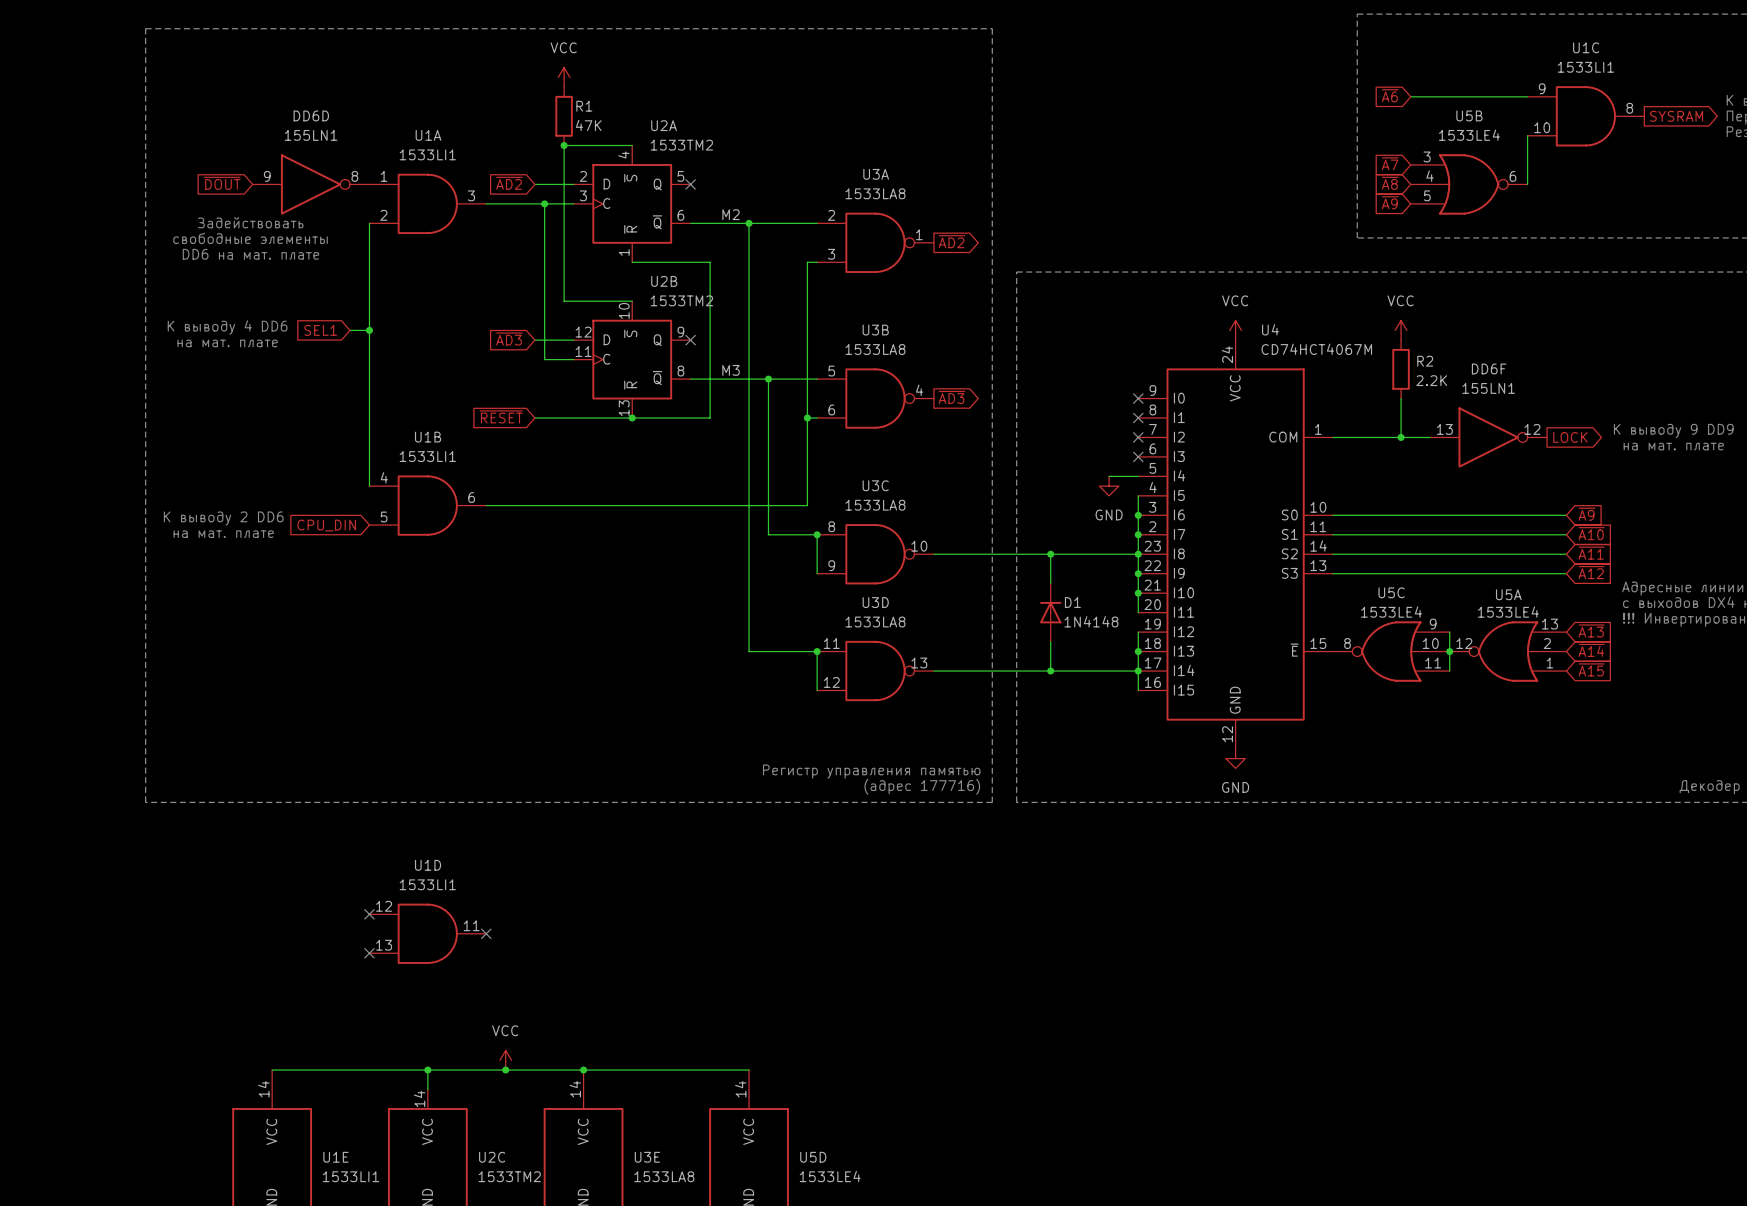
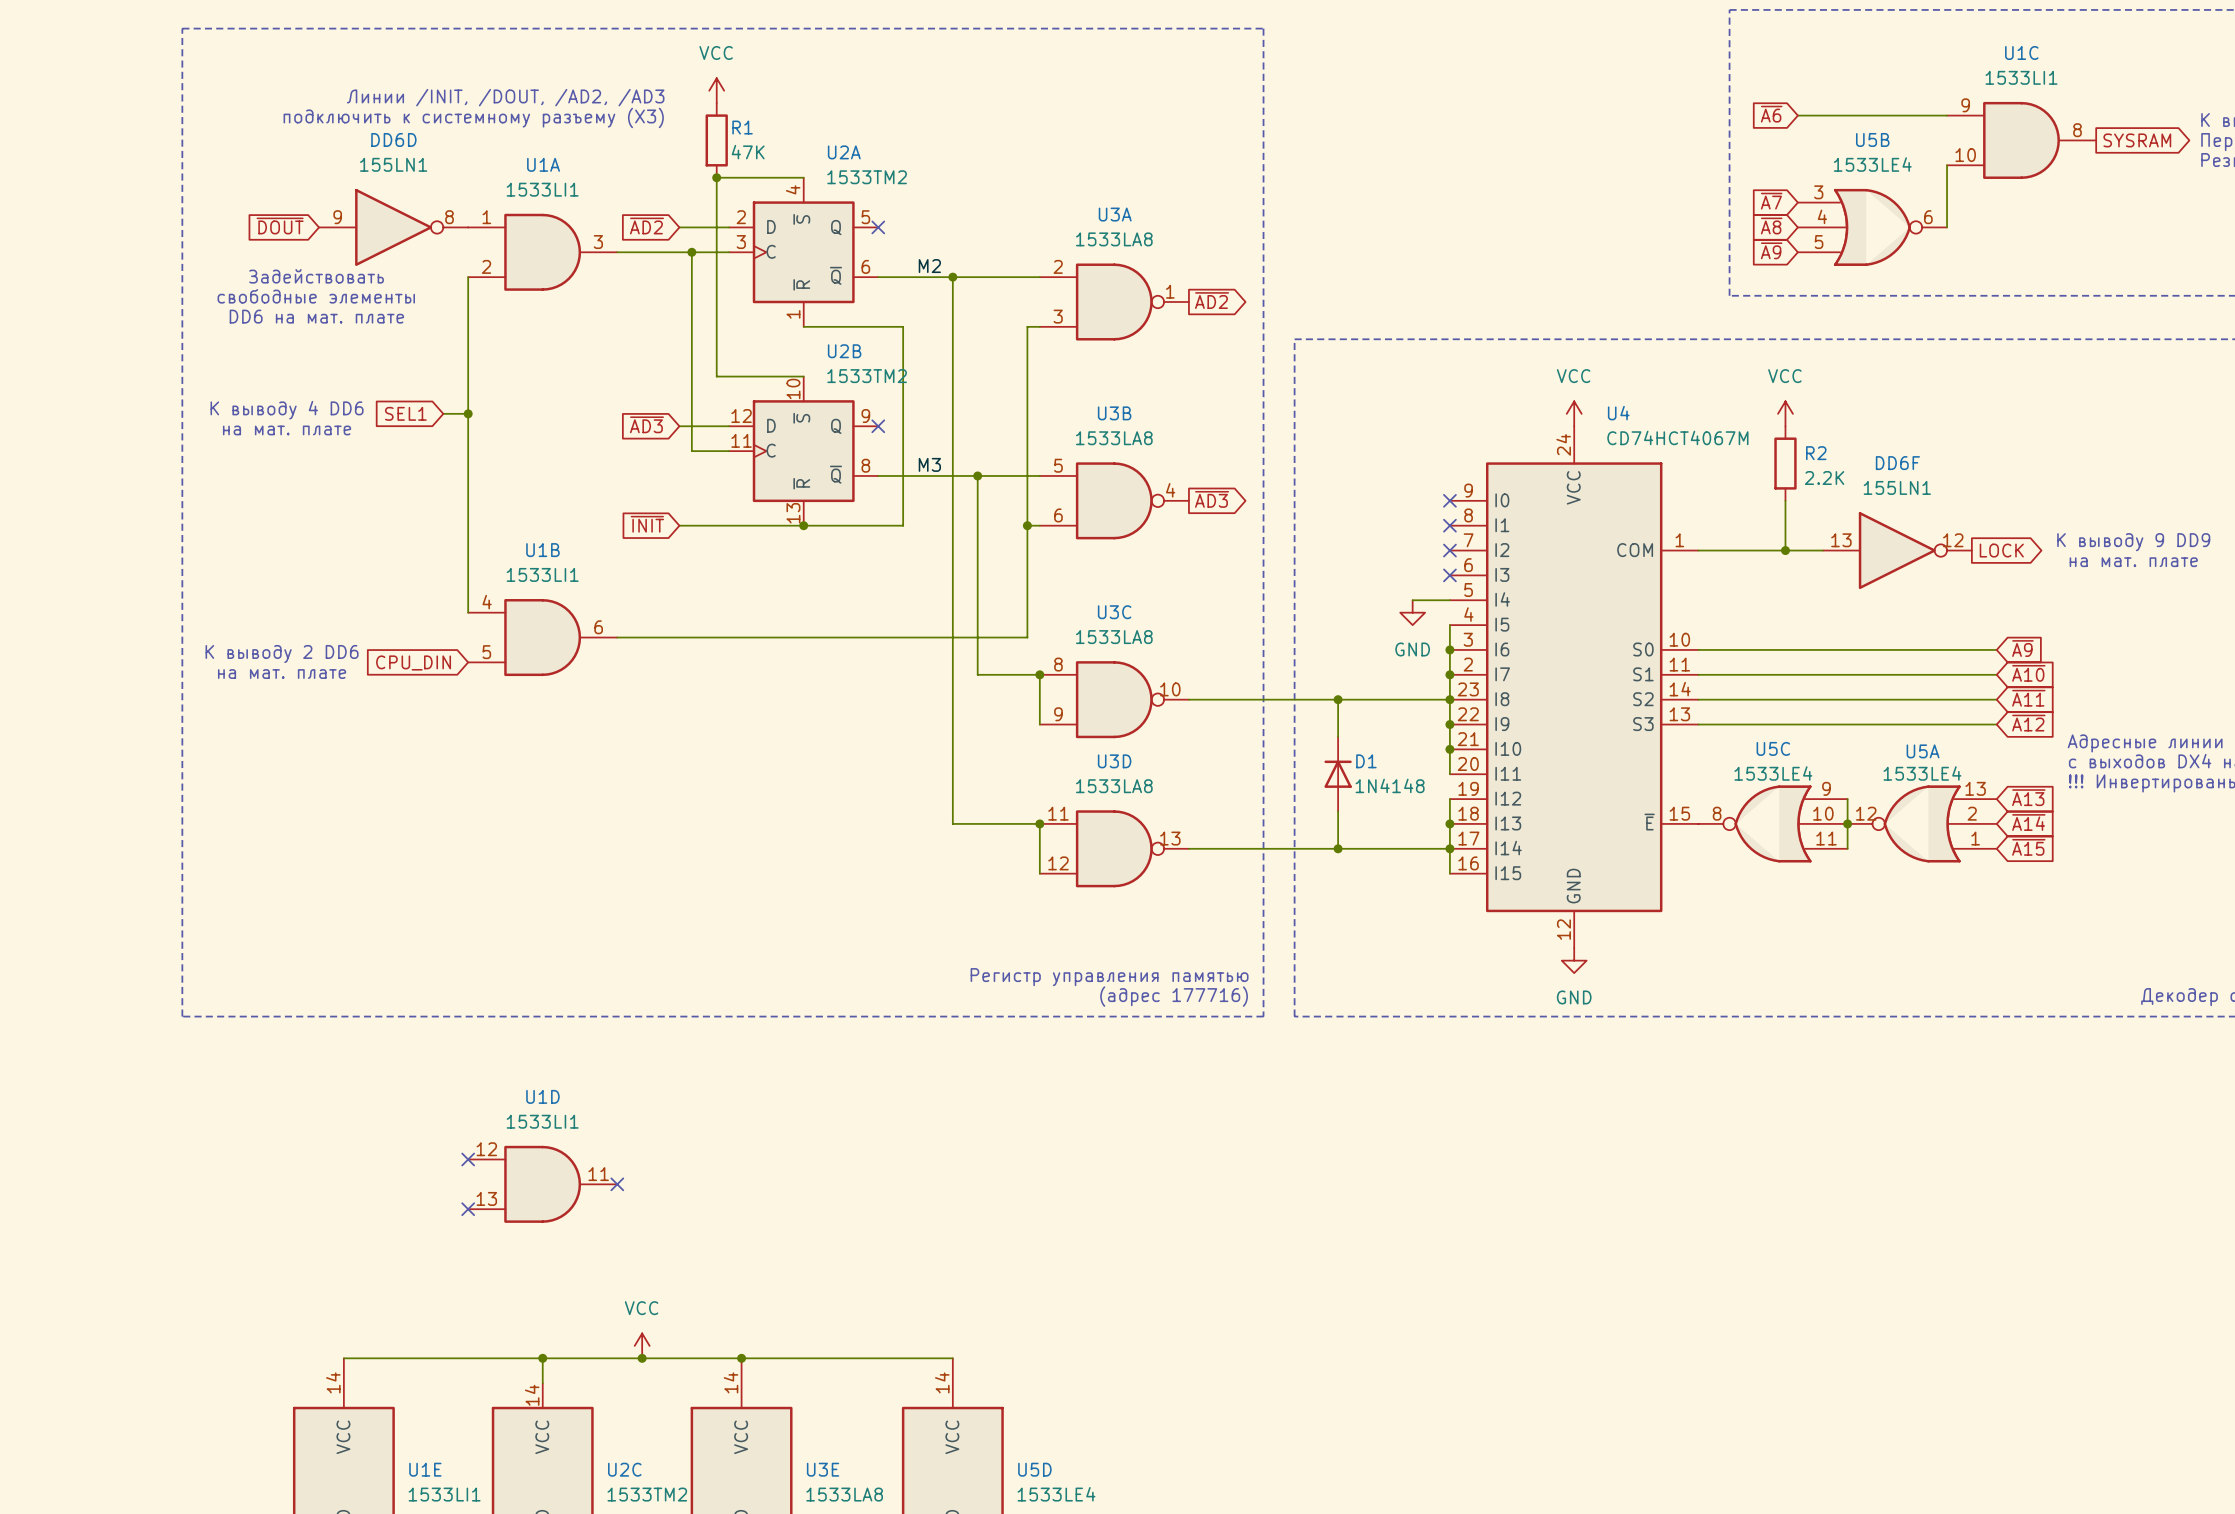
text: none -> Линии /INIT, /DOUT, /AD2, /AD3 (505, 97)
text: none -> подключить к системному разъему (X3) (473, 117)
global label: ~{RESET} (501, 416) -> ~{INIT} (647, 524)

